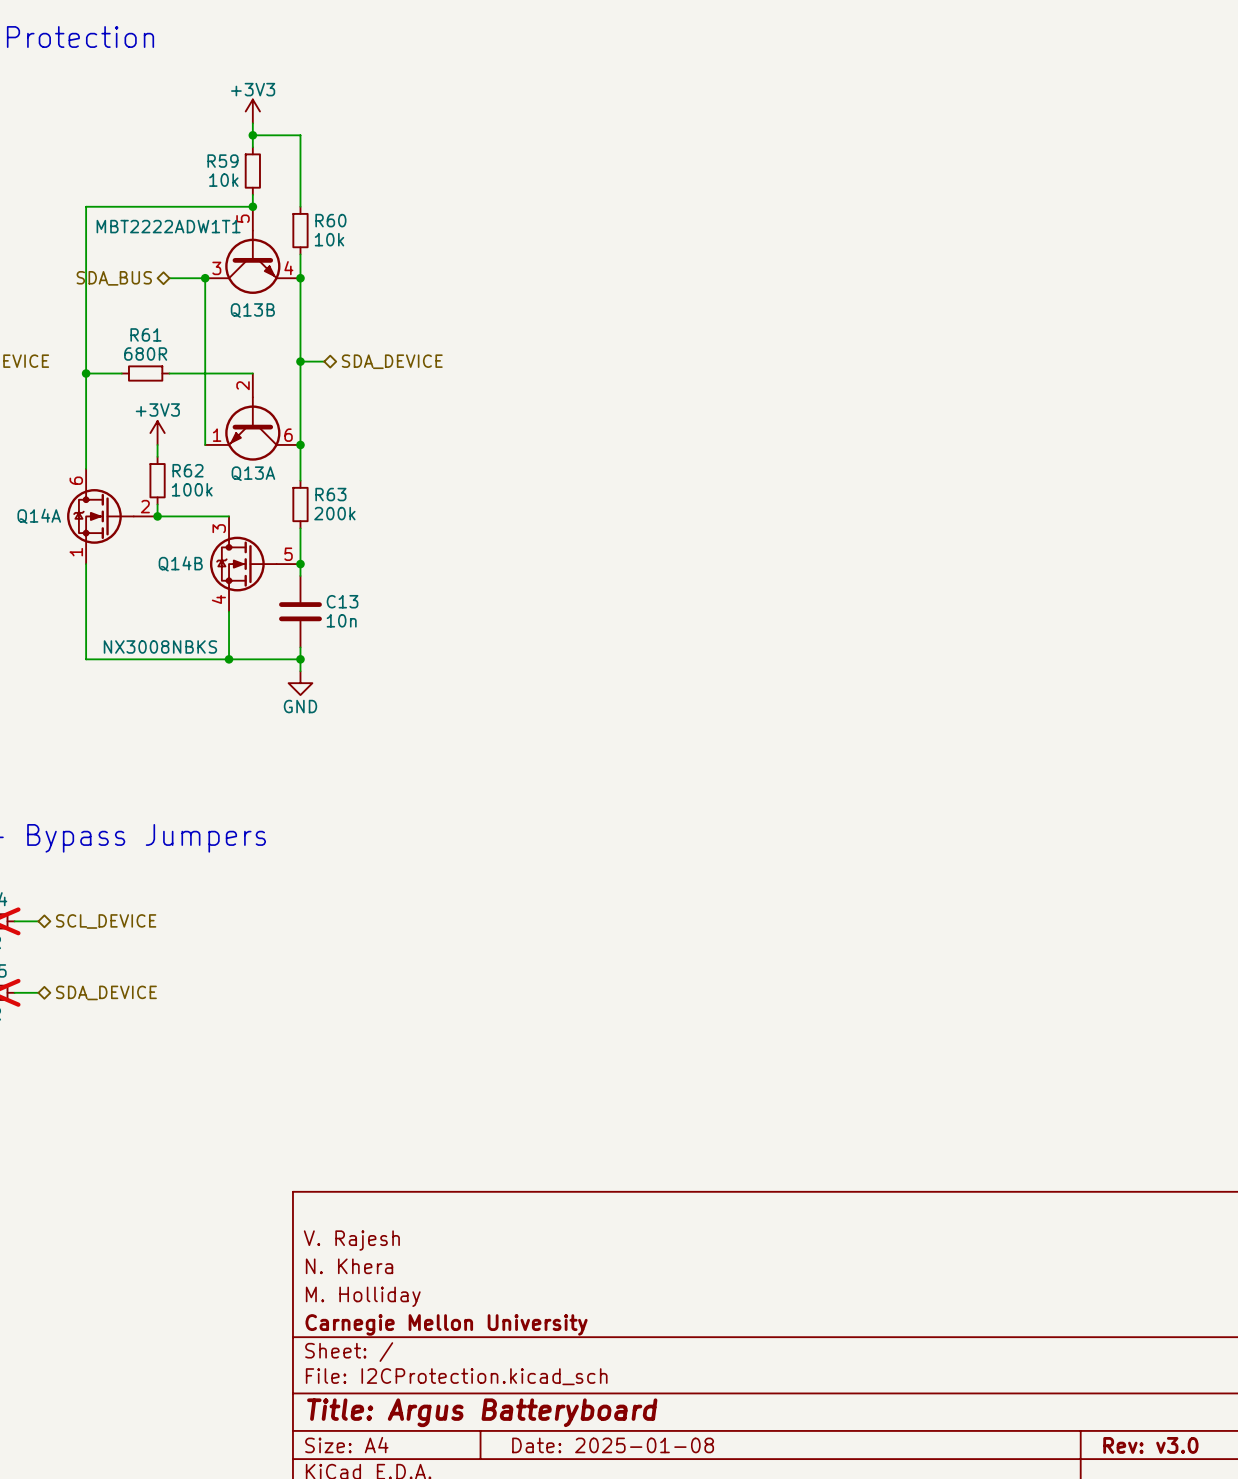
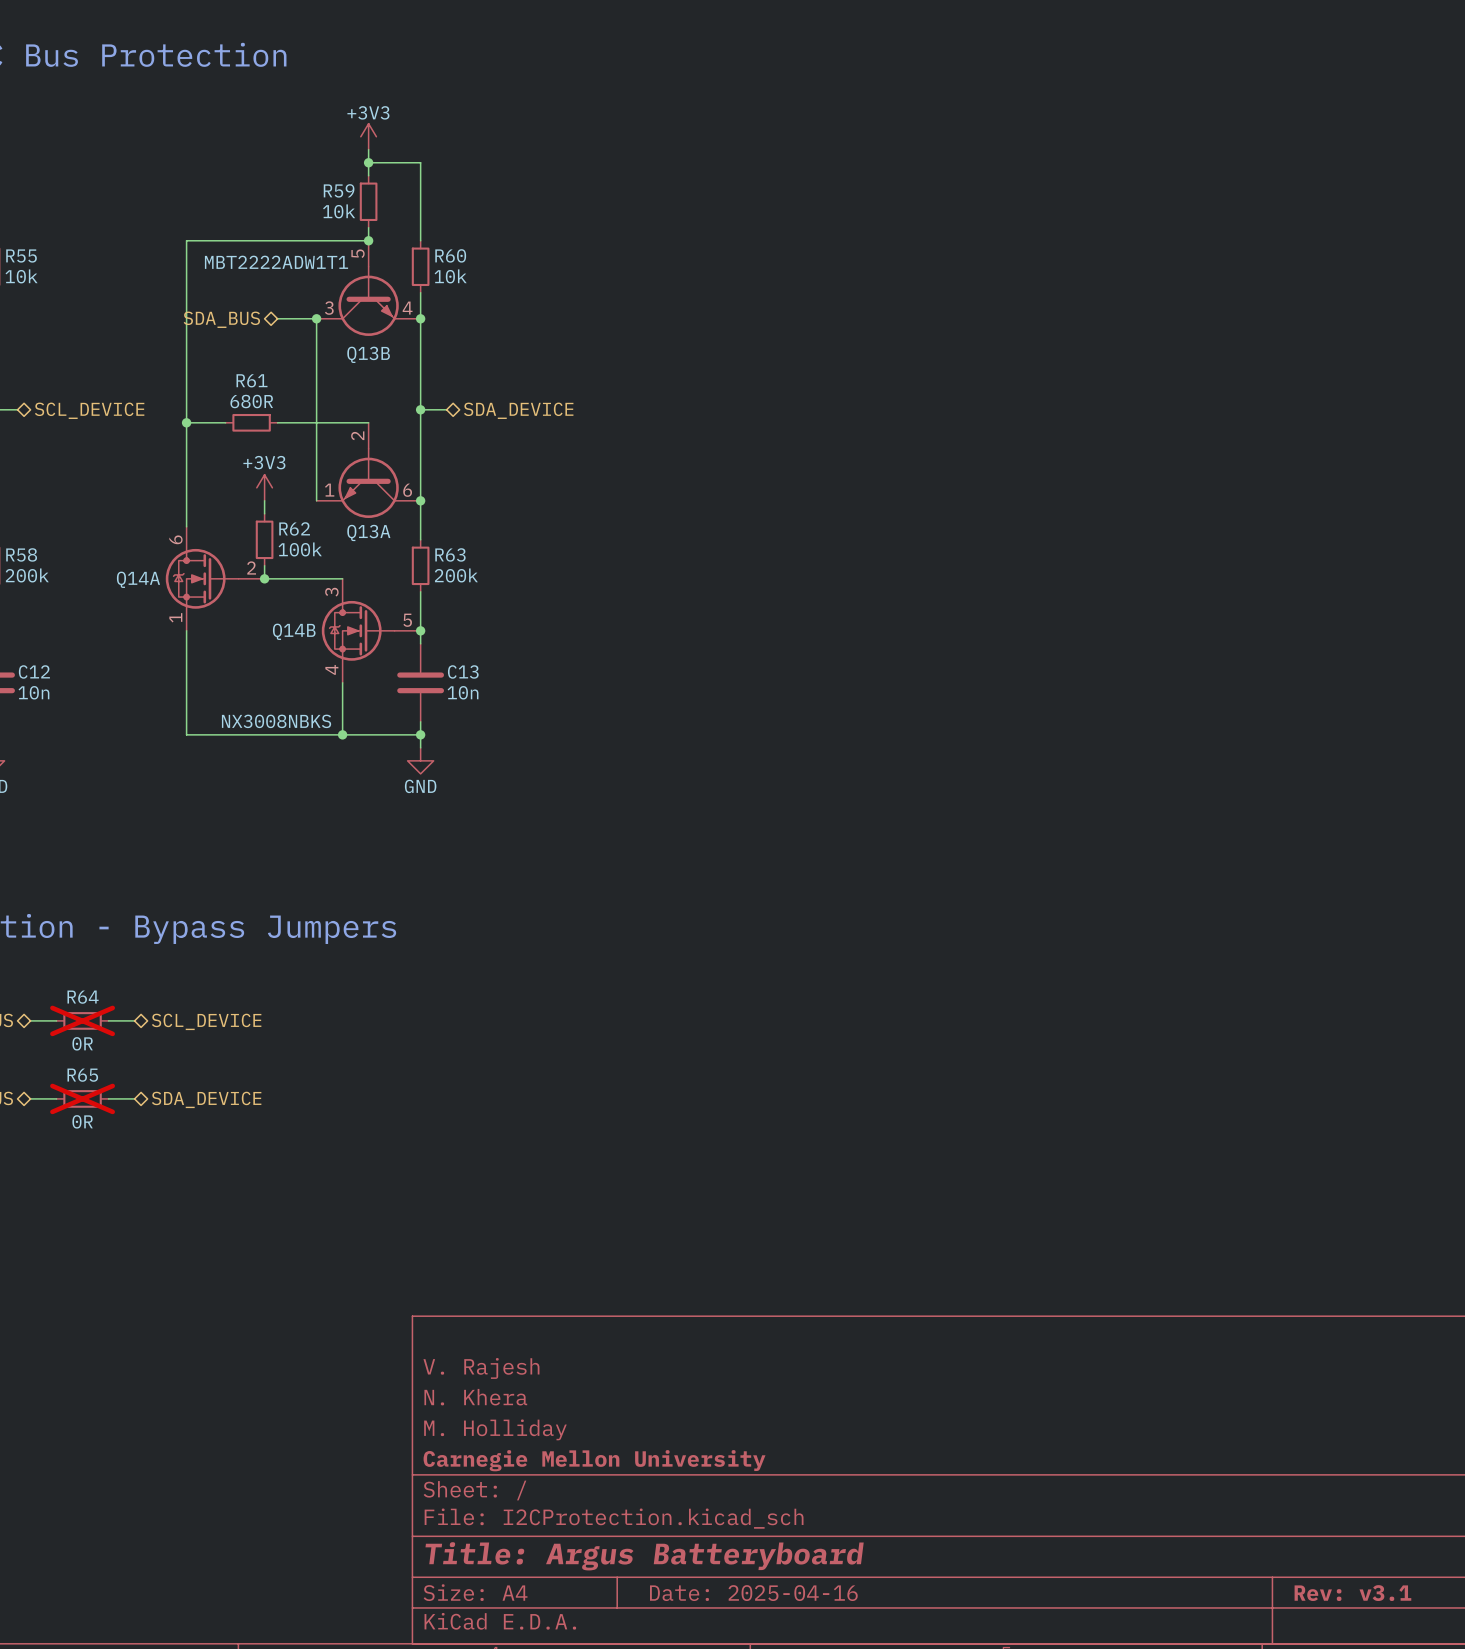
title block: Date: 2025-01-08 (613, 1445) -> Date: 2025-04-16 (753, 1593)
title block: Rev: v3.0 (1150, 1445) -> Rev: v3.1 (1352, 1593)

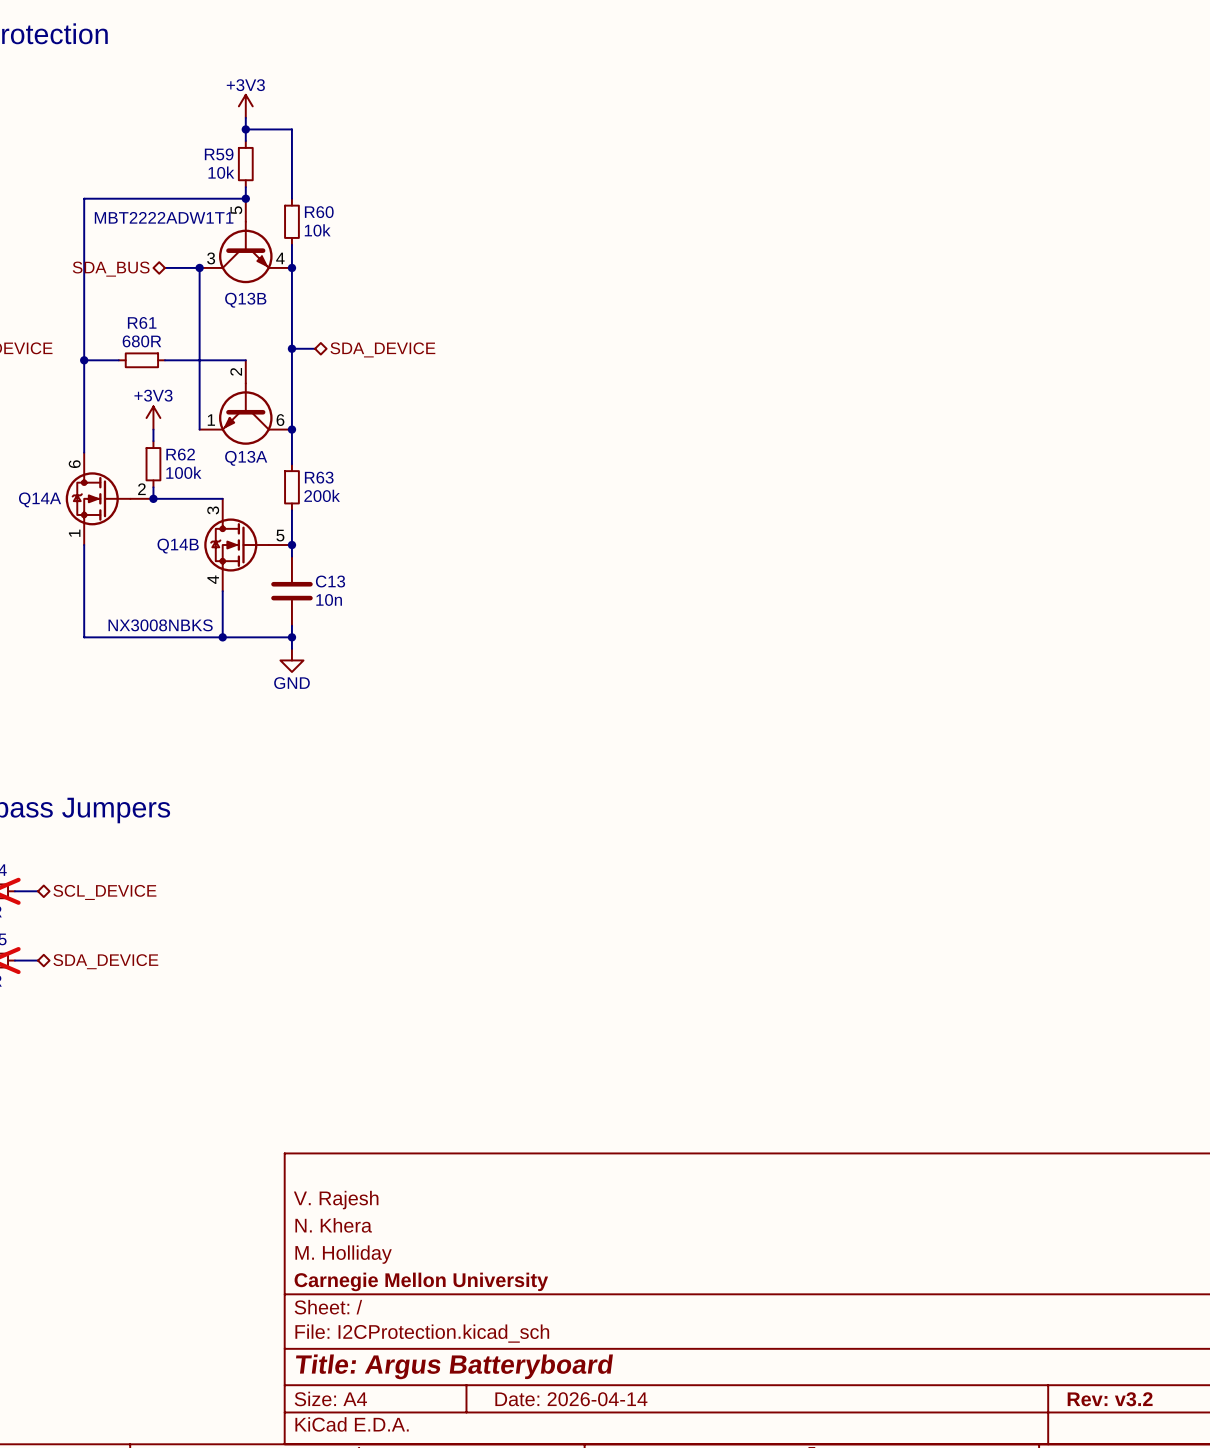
title block: Date: 2025-04-16 (753, 1593) -> Date: 2026-04-14 (571, 1399)
title block: Rev: v3.1 (1352, 1593) -> Rev: v3.2 (1110, 1399)

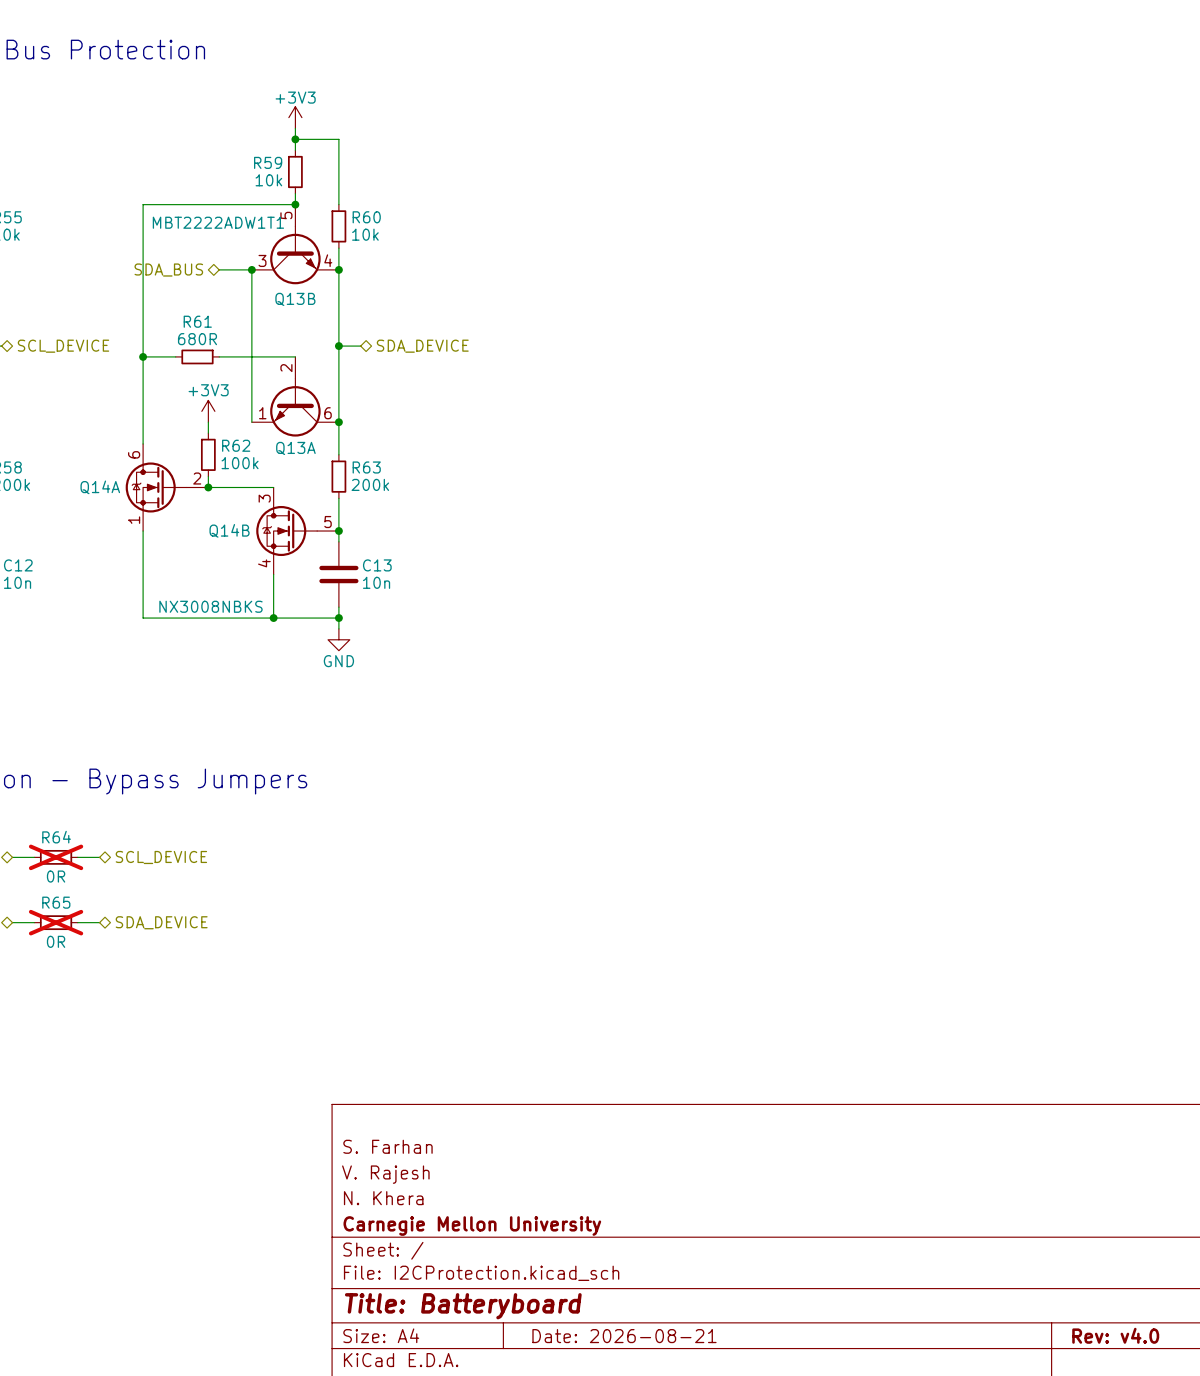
title block: V. Rajesh (336, 1200) -> S. Farhan (387, 1146)
title block: N. Khera (333, 1225) -> V. Rajesh (385, 1174)
title block: M. Holliday (343, 1254) -> N. Khera (383, 1198)
title block: Title: Argus Batteryboard (454, 1366) -> Title: Batteryboard (463, 1306)
title block: Date: 2026-04-14 (571, 1399) -> Date: 2026-08-21 (624, 1336)
title block: Rev: v3.2 (1110, 1399) -> Rev: v4.0 (1115, 1335)

